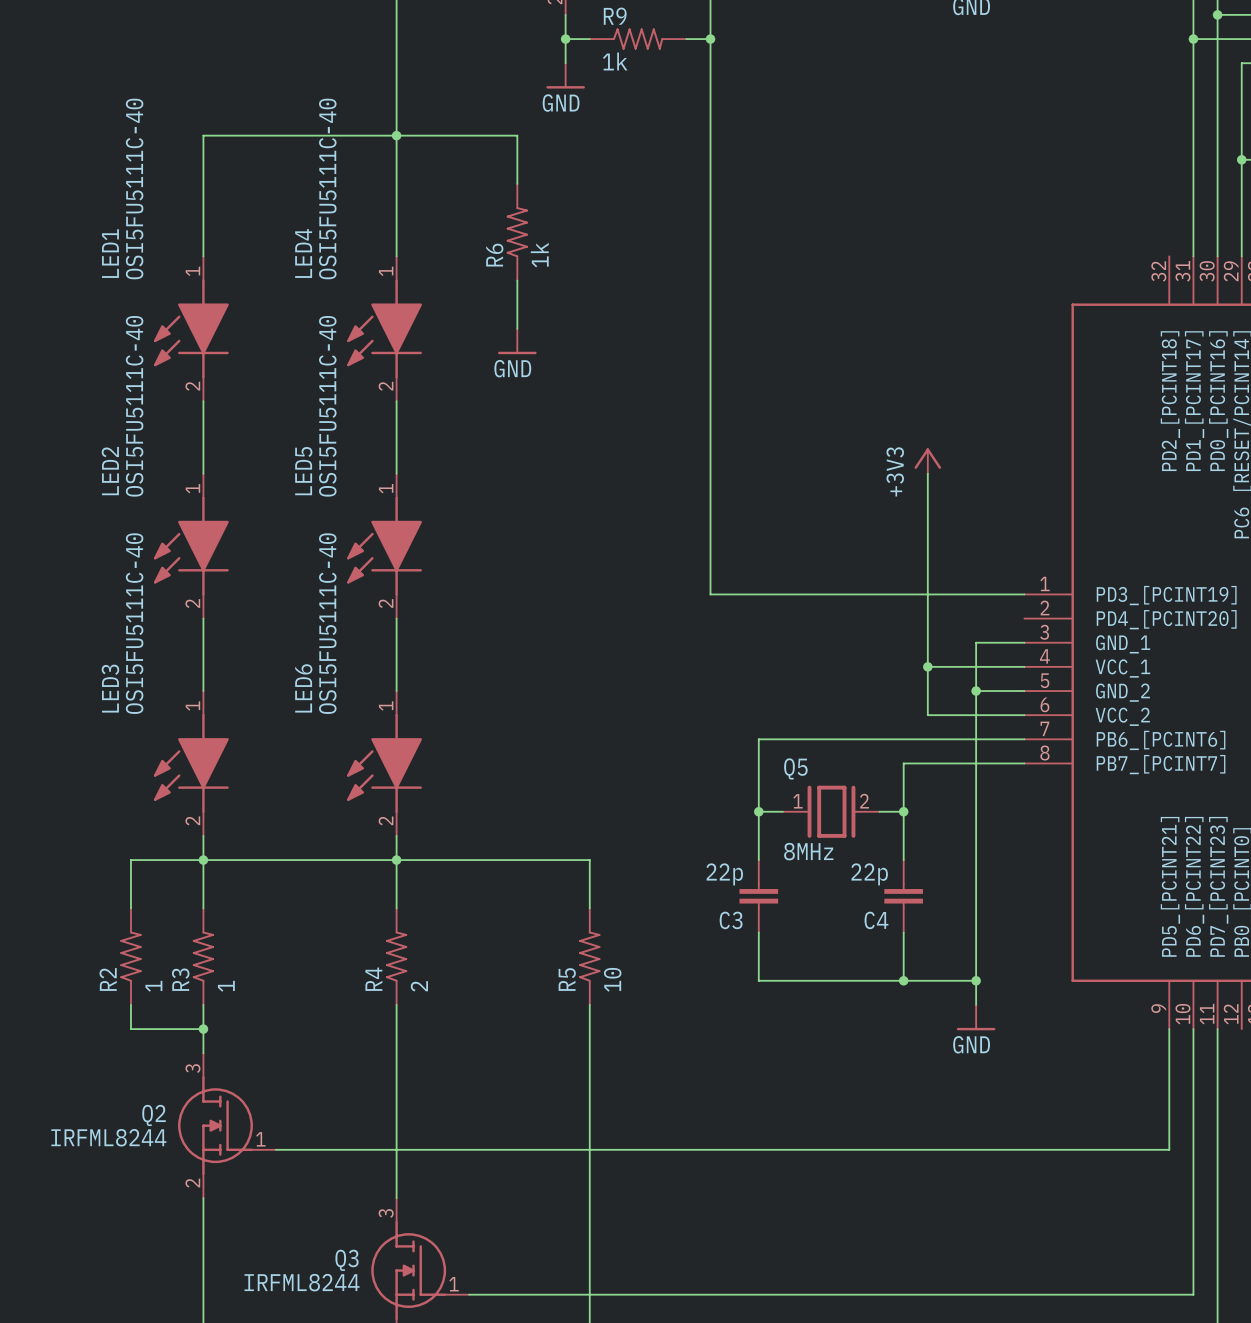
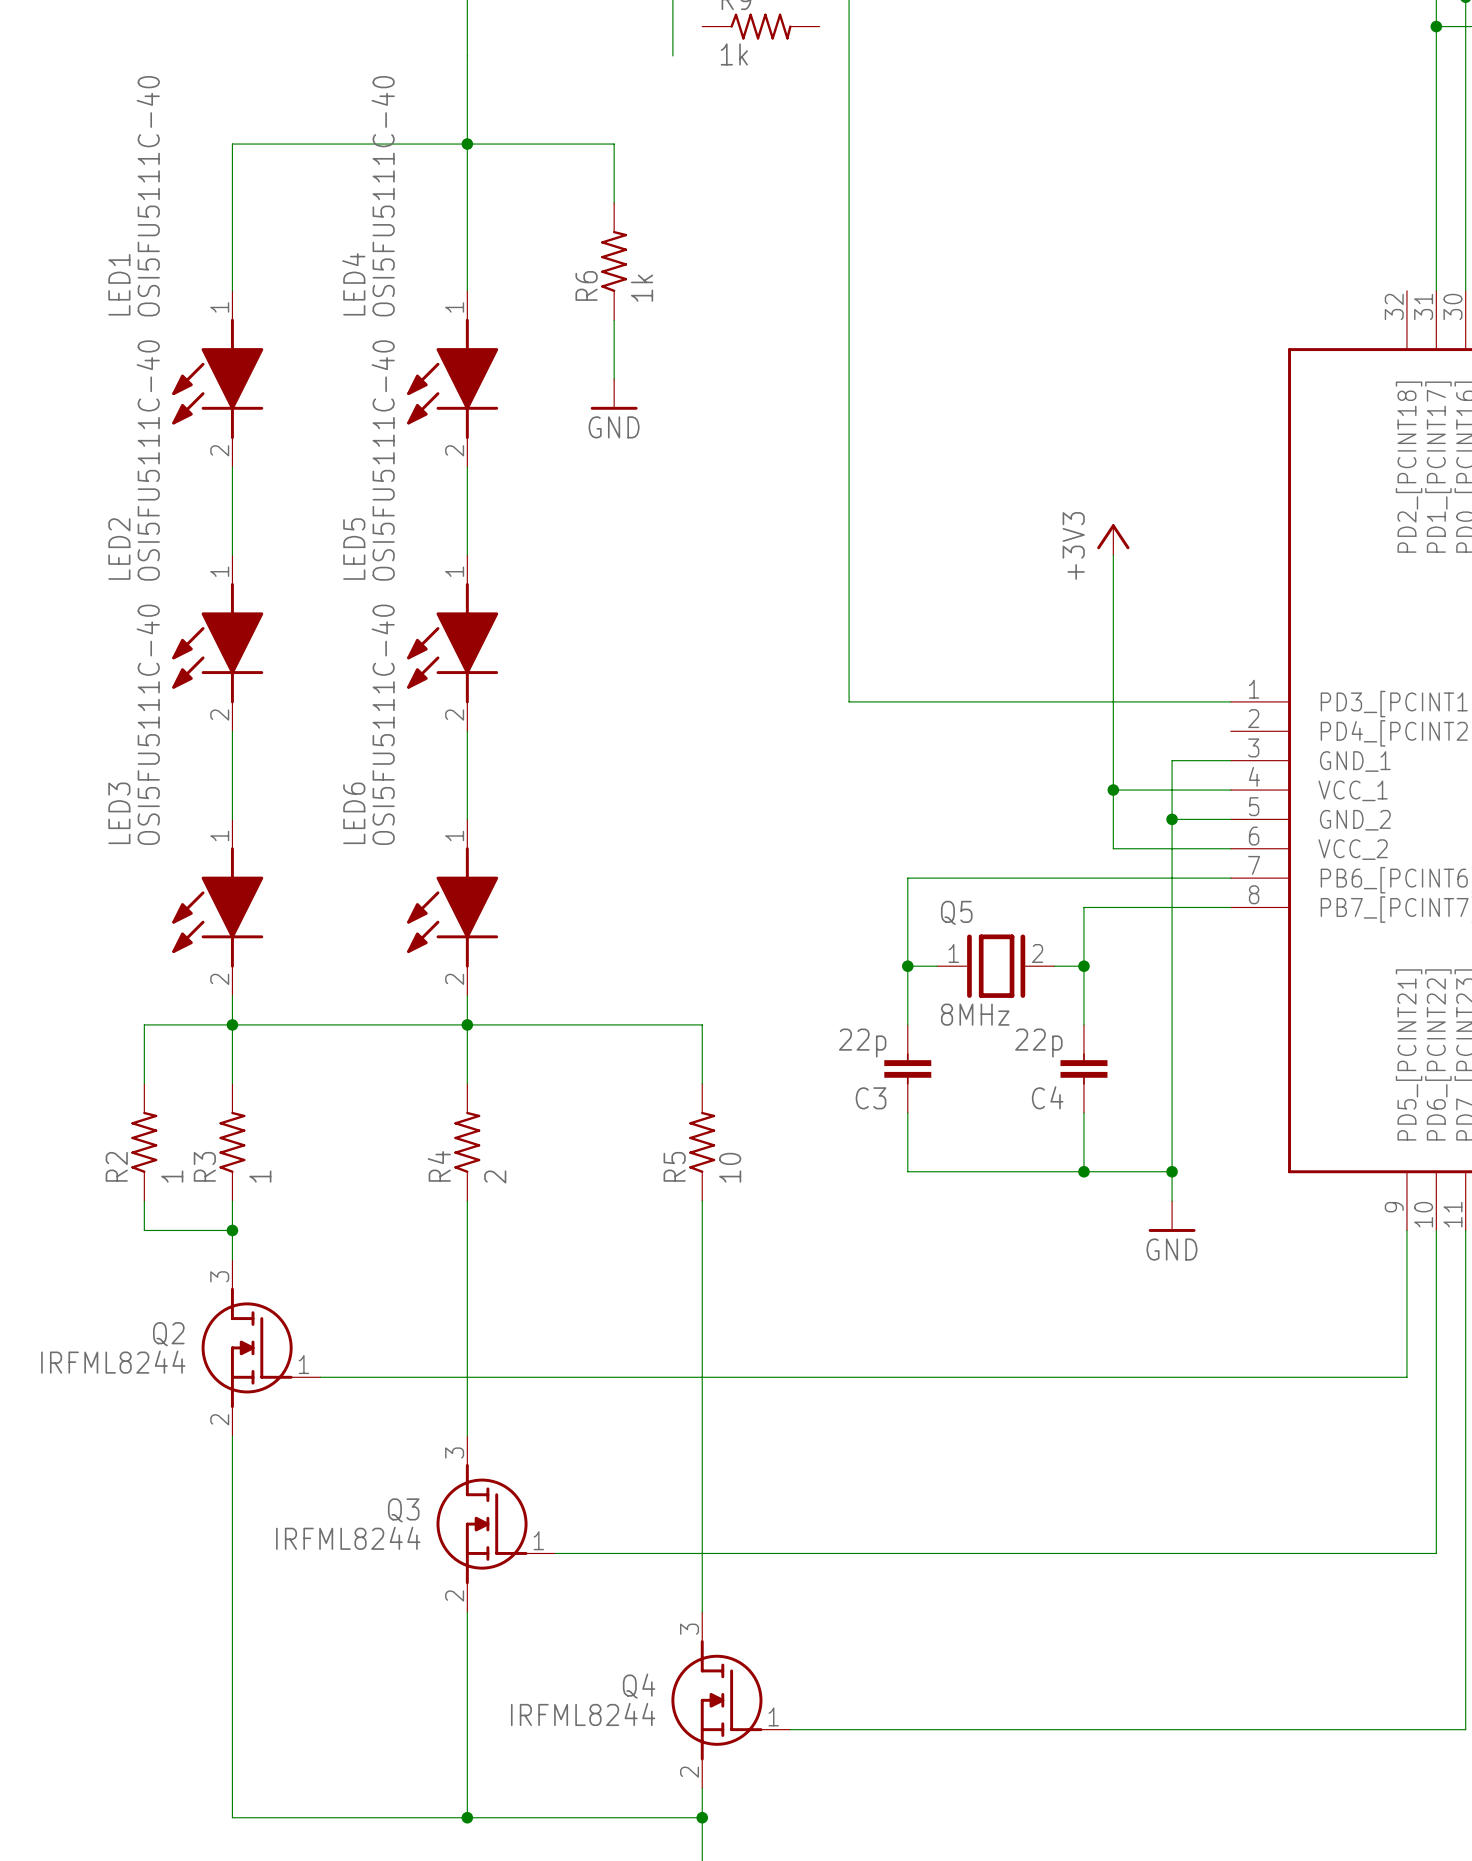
wire: (565, 39) (589, 39) -> none
junction: (565, 39) -> none
wire: (686, 39) (710, 39) -> none
junction: (710, 39) -> none
power symbol: GND (565, 75) -> none

